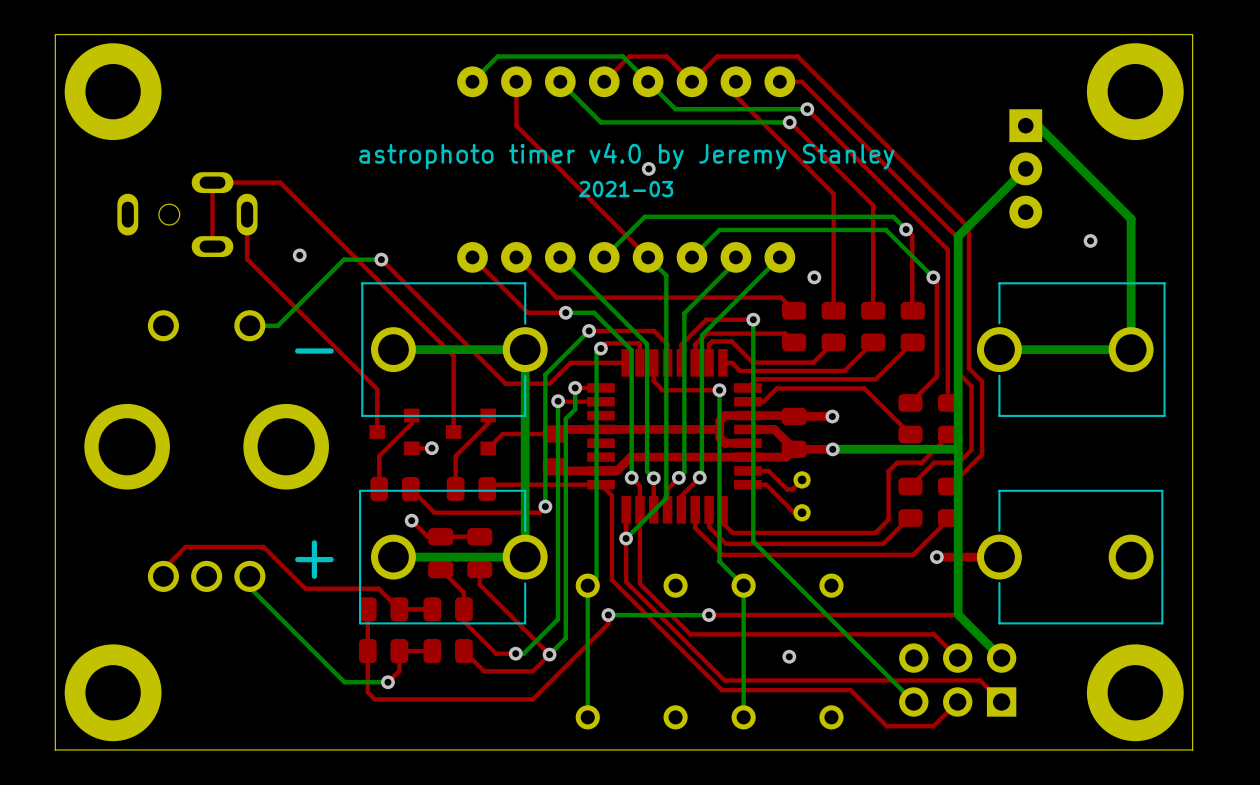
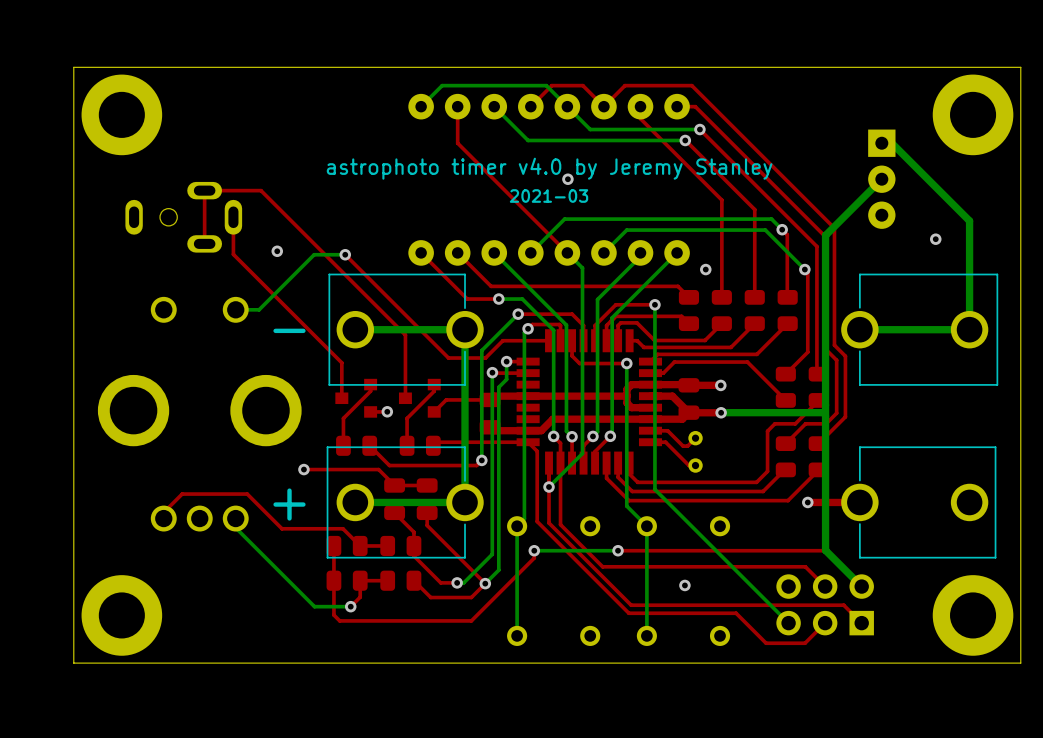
top track: (411, 520) (427, 536) (440, 536) -> (303, 469) (378, 469) (394, 485)
via position: (411, 520) -> (303, 469)

